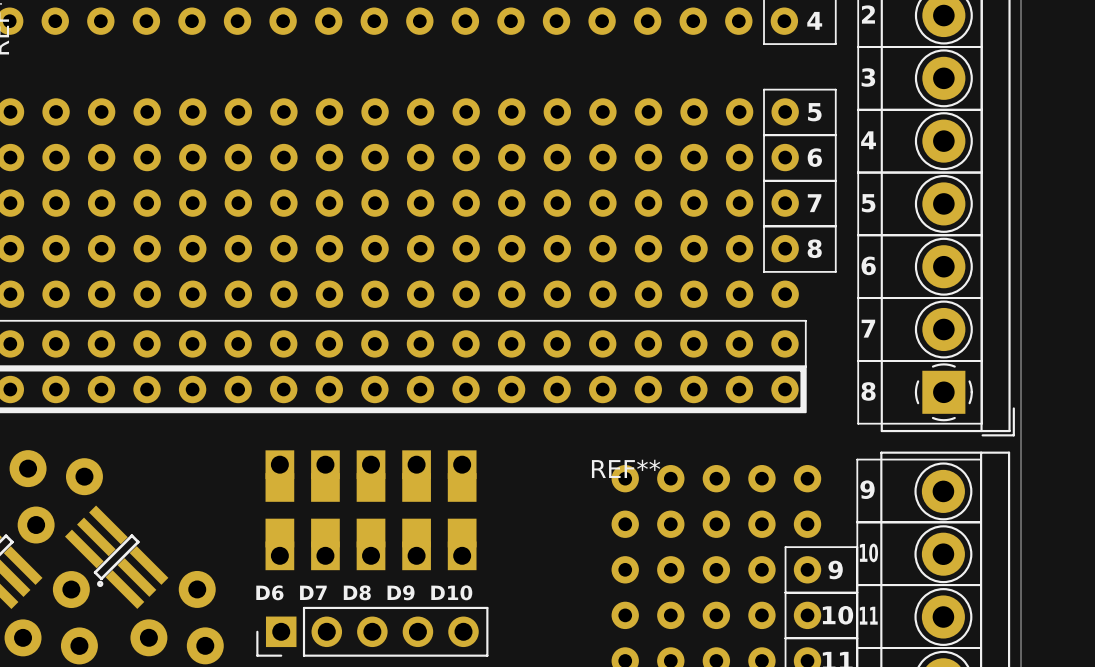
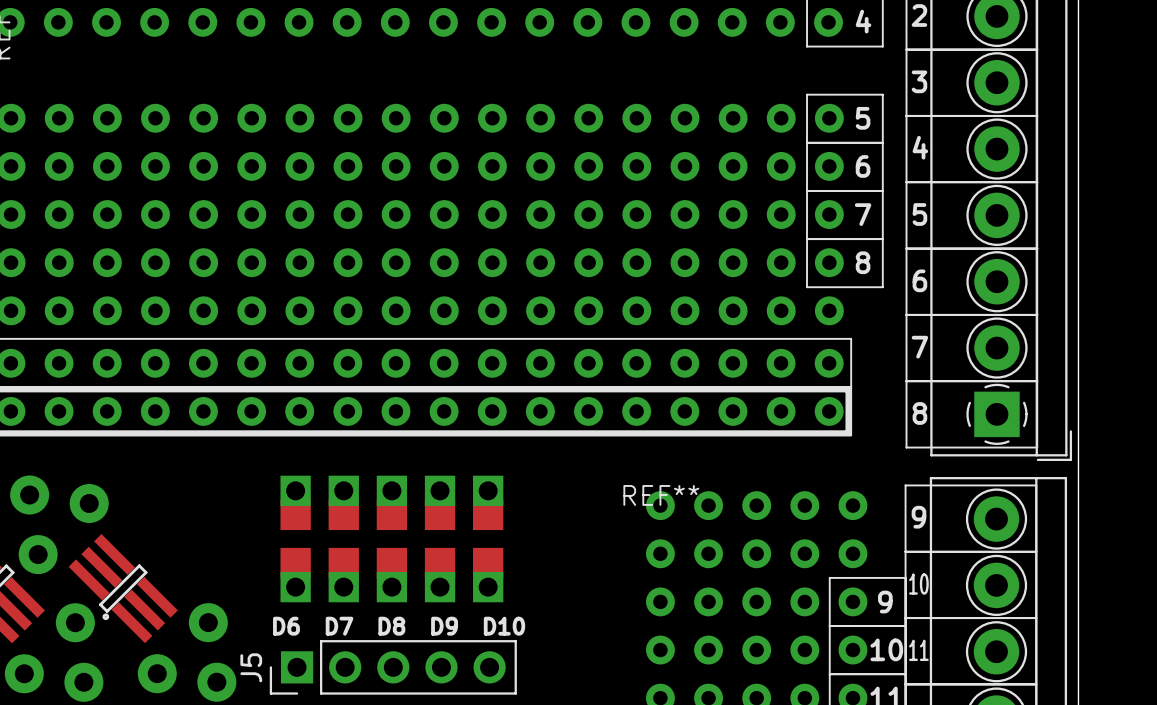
part: (372, 631) -> none
J5: none -> (393, 667)

